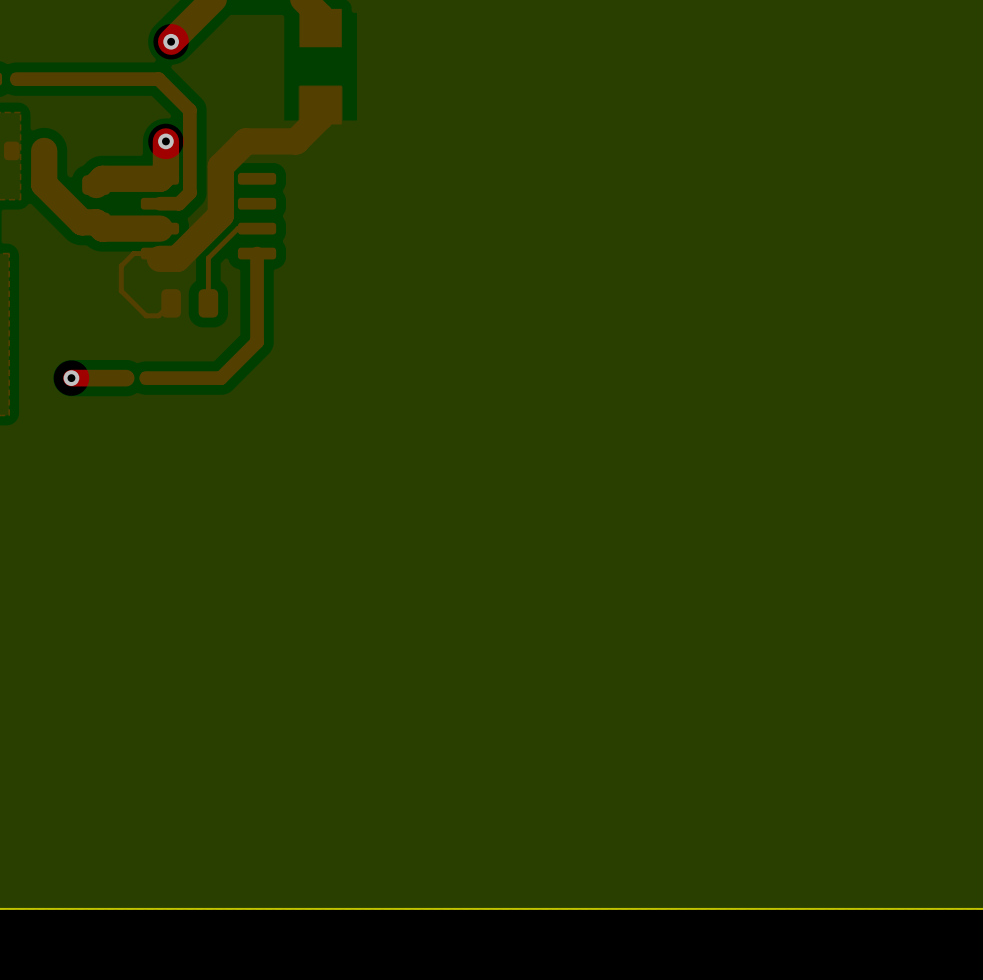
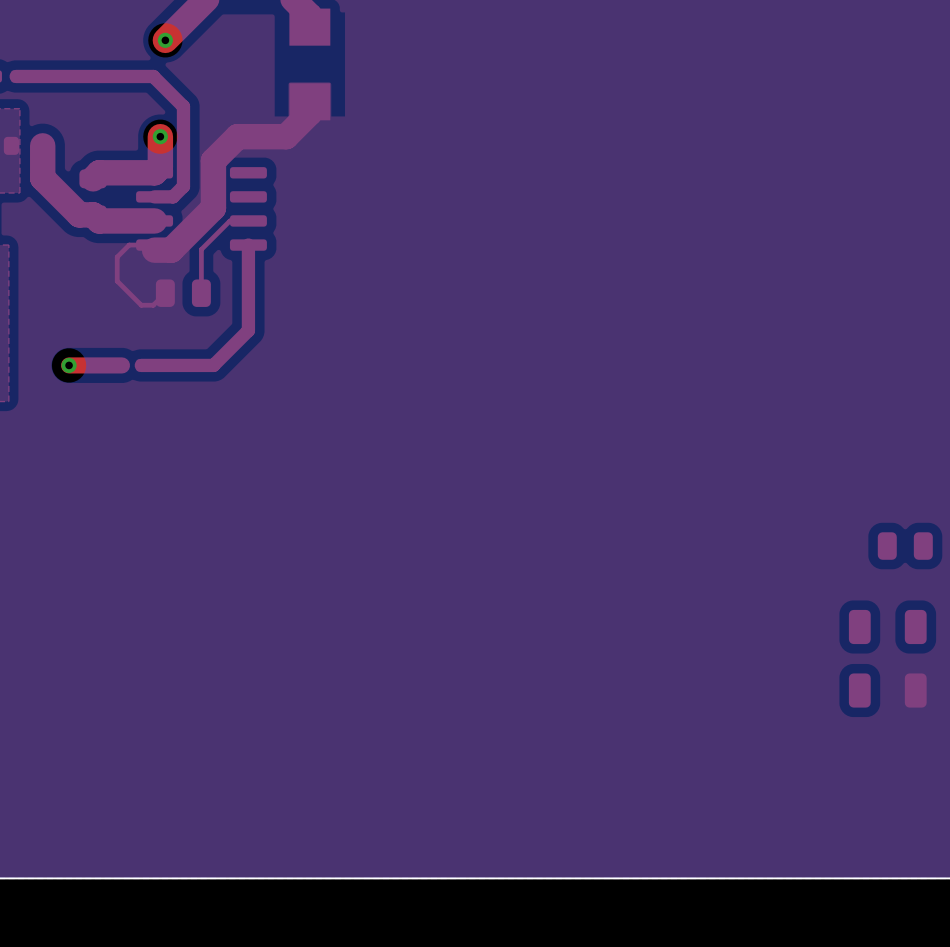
part: none -> (905, 546)
part: none -> (887, 626)
part: none -> (887, 690)

